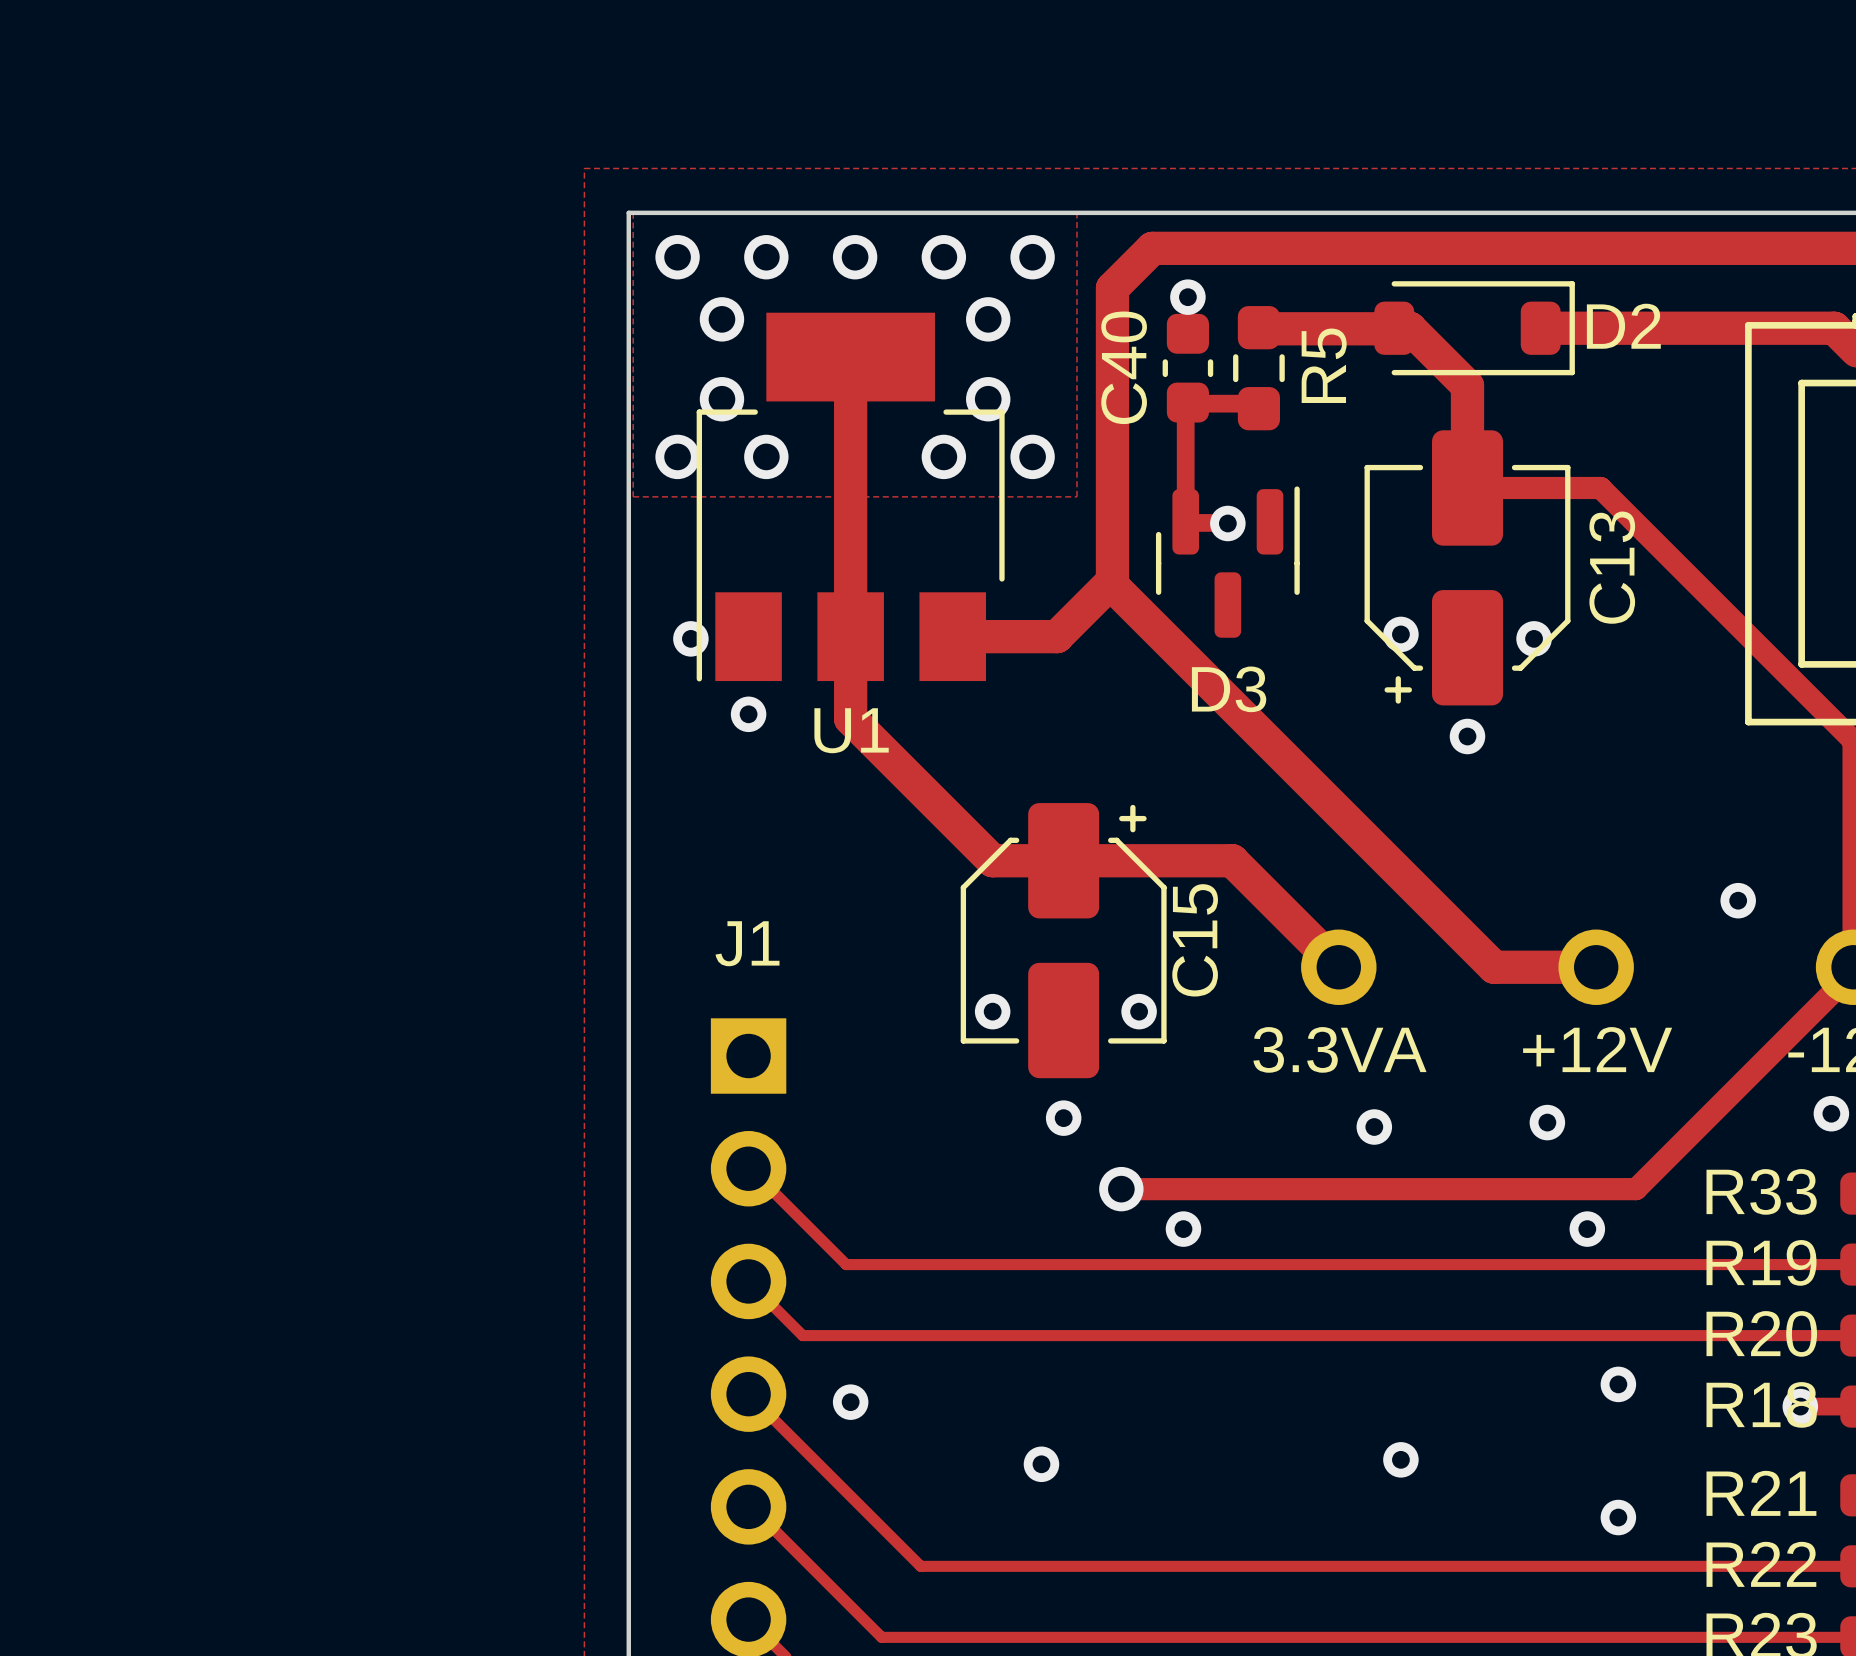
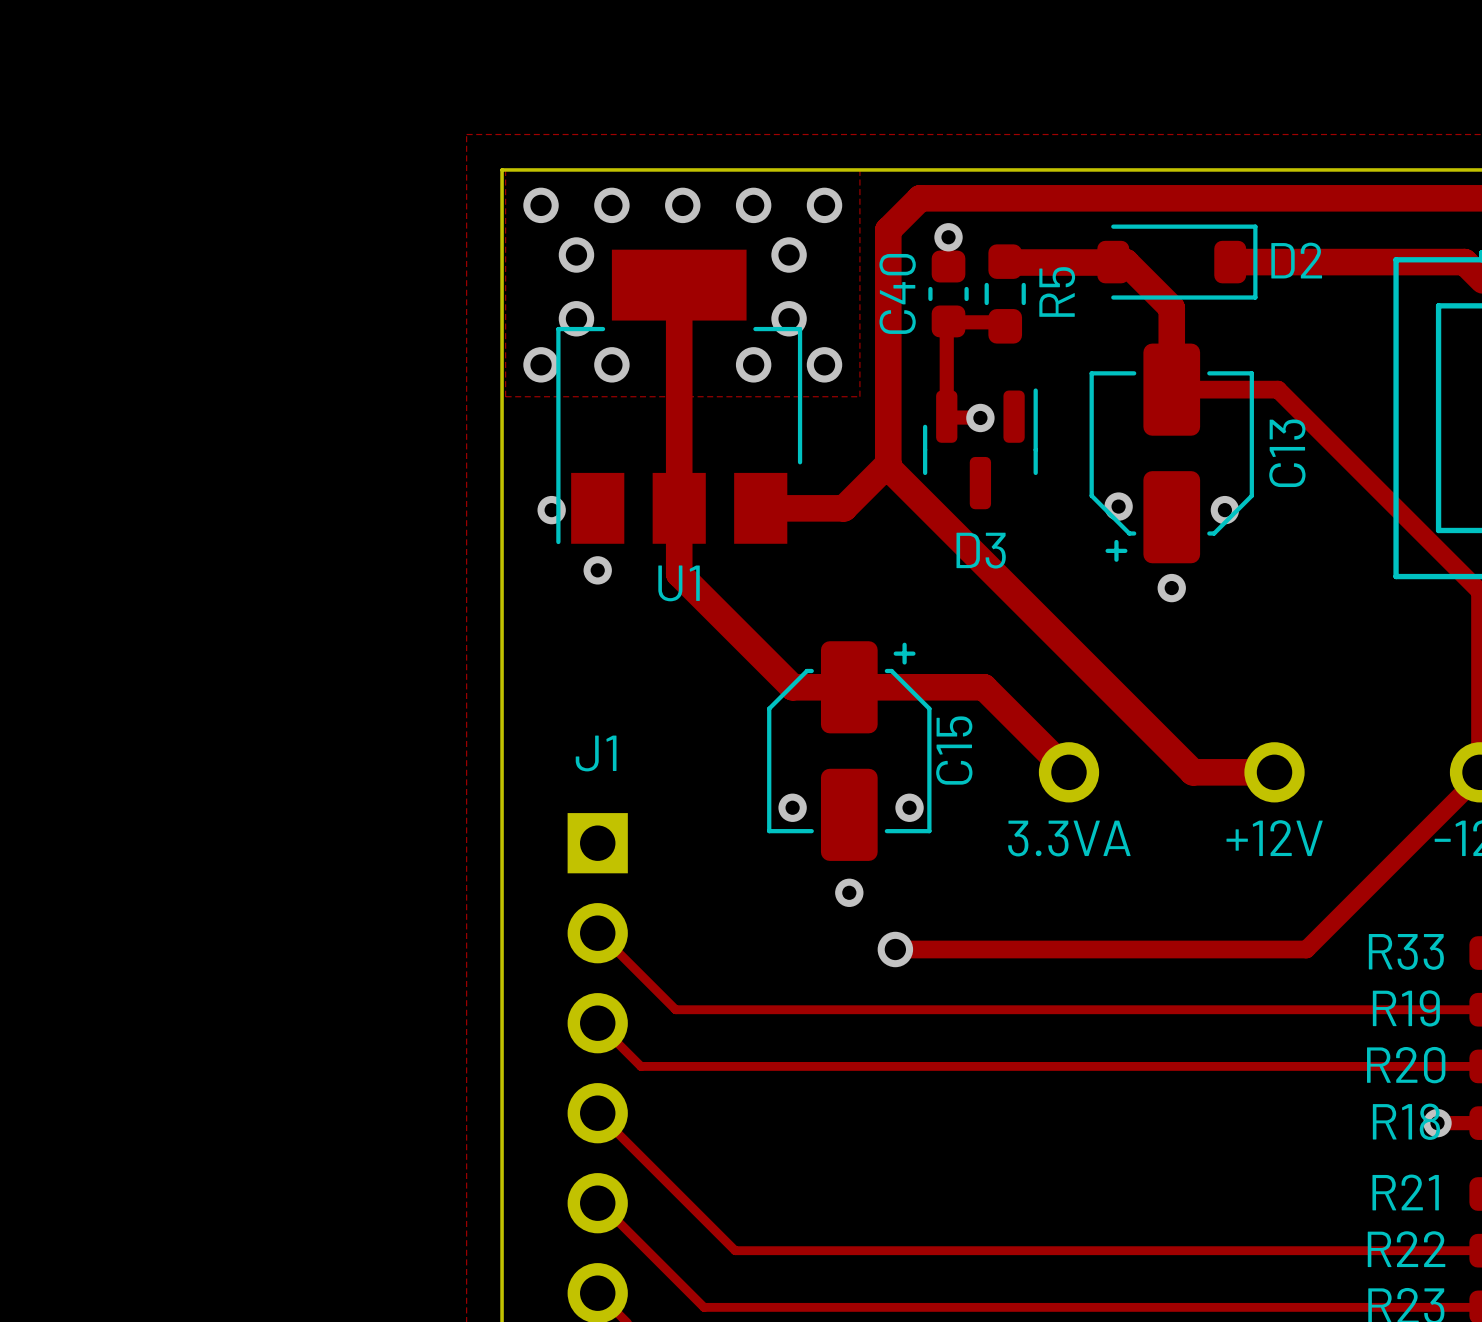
via: (1738, 900) -> none
via: (1831, 1113) -> none
via: (1547, 1122) -> none
via: (1374, 1127) -> none
via: (1183, 1229) -> none
via: (1587, 1229) -> none
via: (1618, 1384) -> none
via: (850, 1402) -> none
via: (1400, 1459) -> none
via: (1041, 1464) -> none
via: (1618, 1517) -> none

